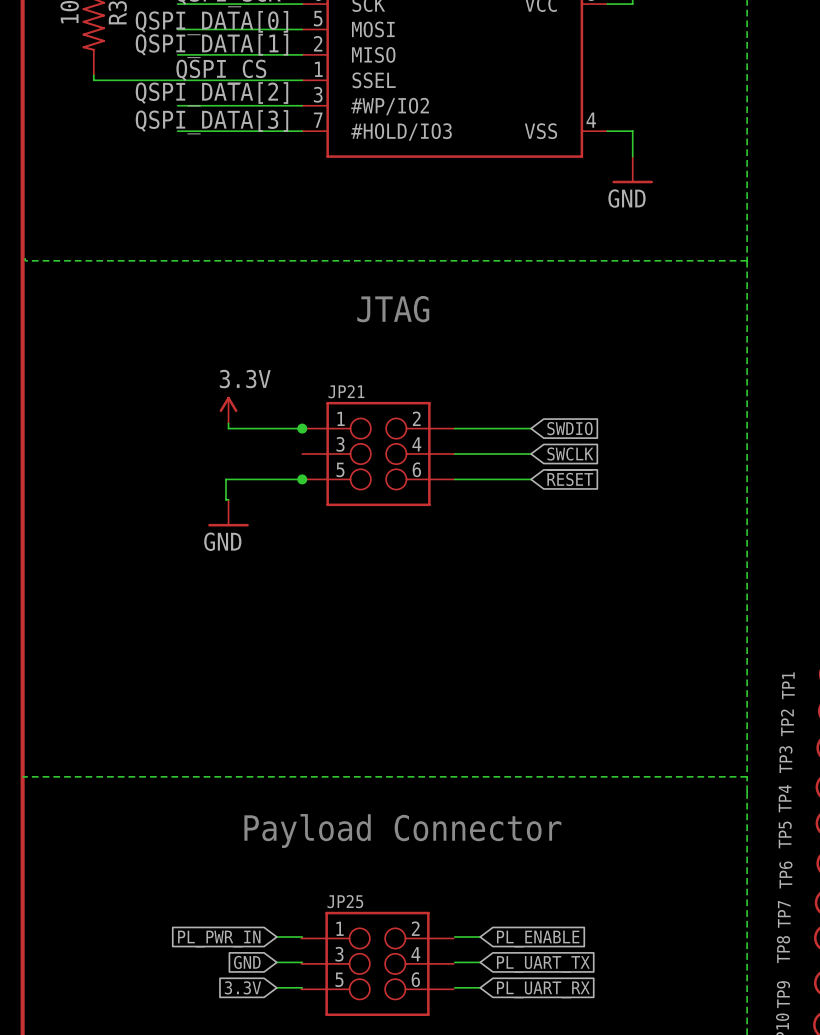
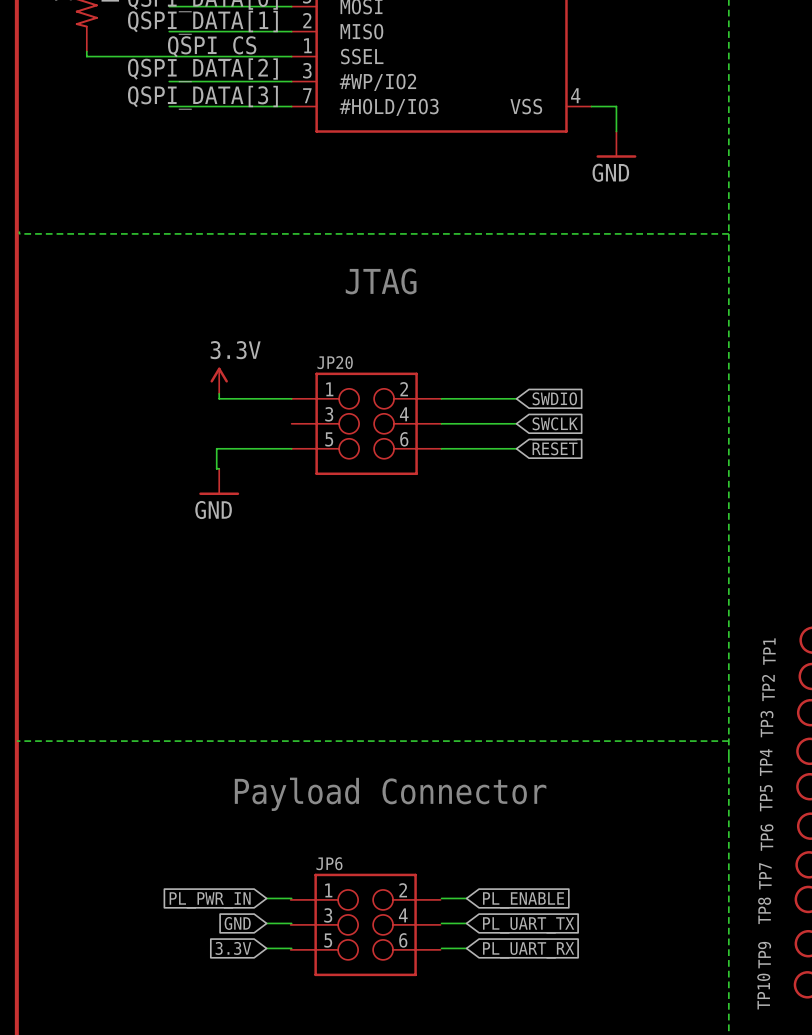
JP21 name: JP21 (346, 391) -> JP20 (335, 362)
junction: (302, 428) -> none
junction: (302, 479) -> none
JP25 name: JP25 (345, 901) -> JP6 (329, 863)

